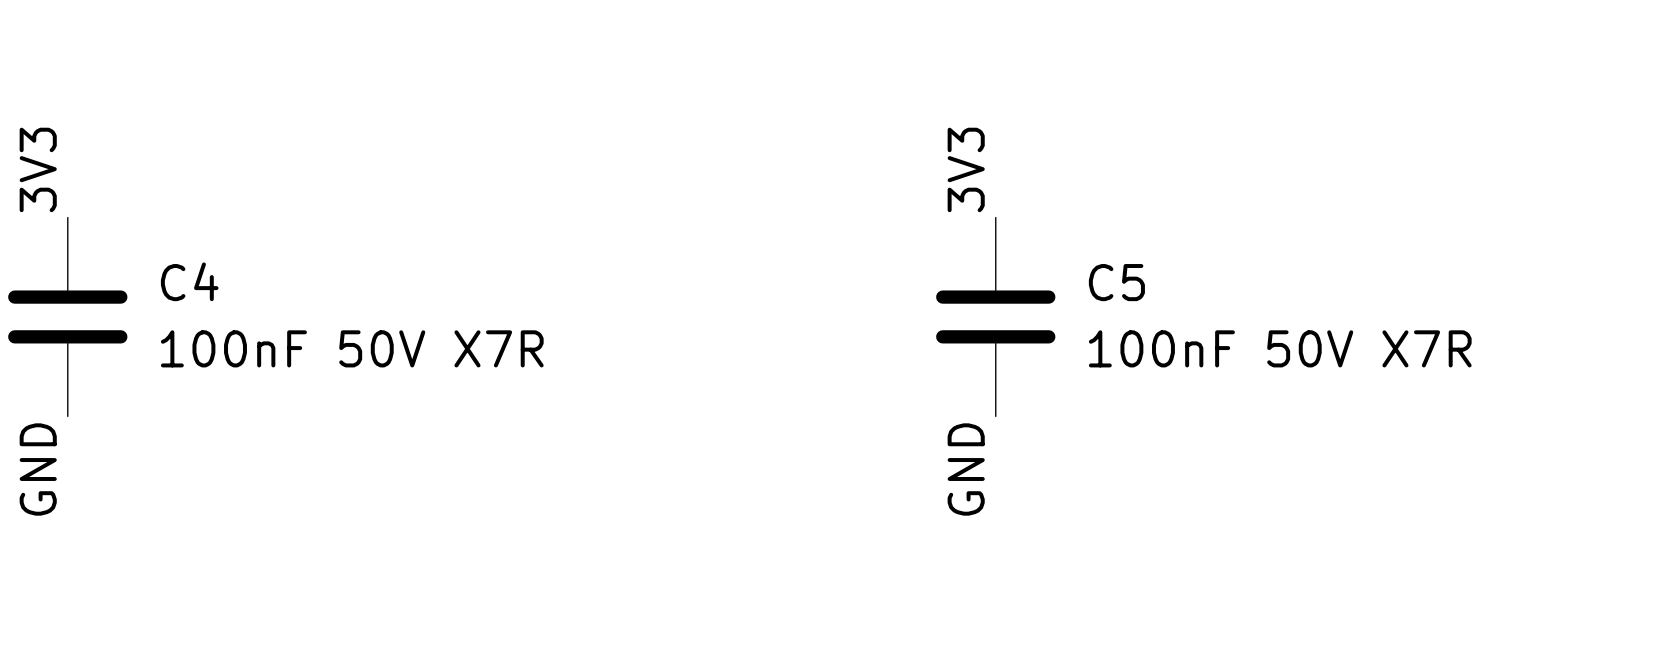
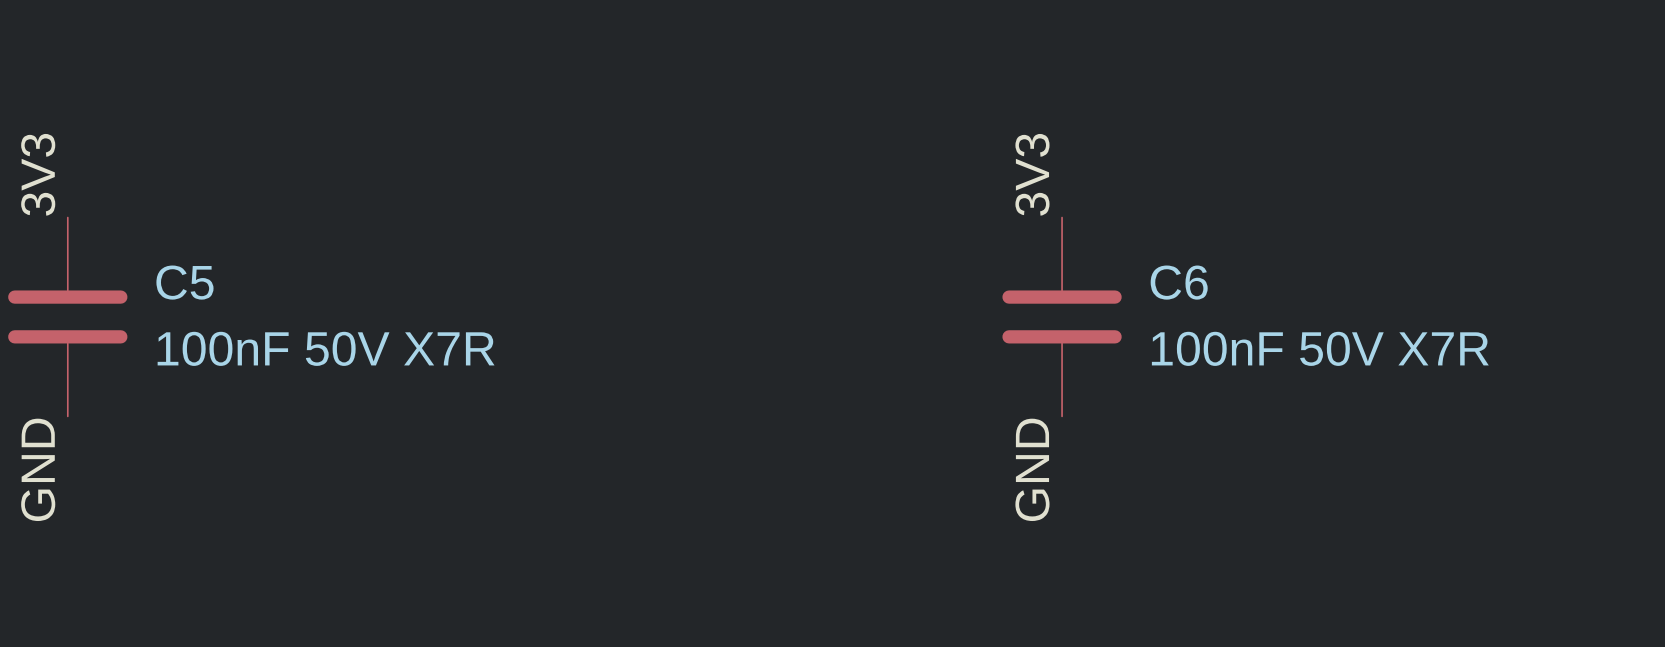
label position: 3V3 (966, 169) -> 3V3 (1032, 174)
C4 name: C4 (189, 281) -> C5 (184, 282)
C5: 100nF 50V X7R (995, 316) -> none
C6: none -> 100nF 50V X7R (1062, 316)
label position: GND (966, 469) -> GND (1032, 469)

